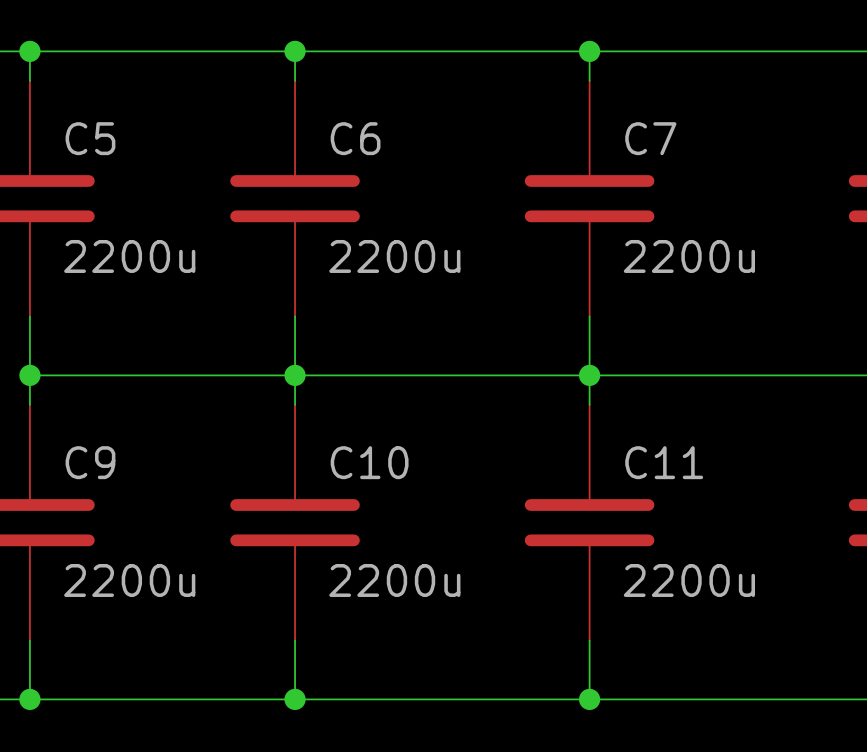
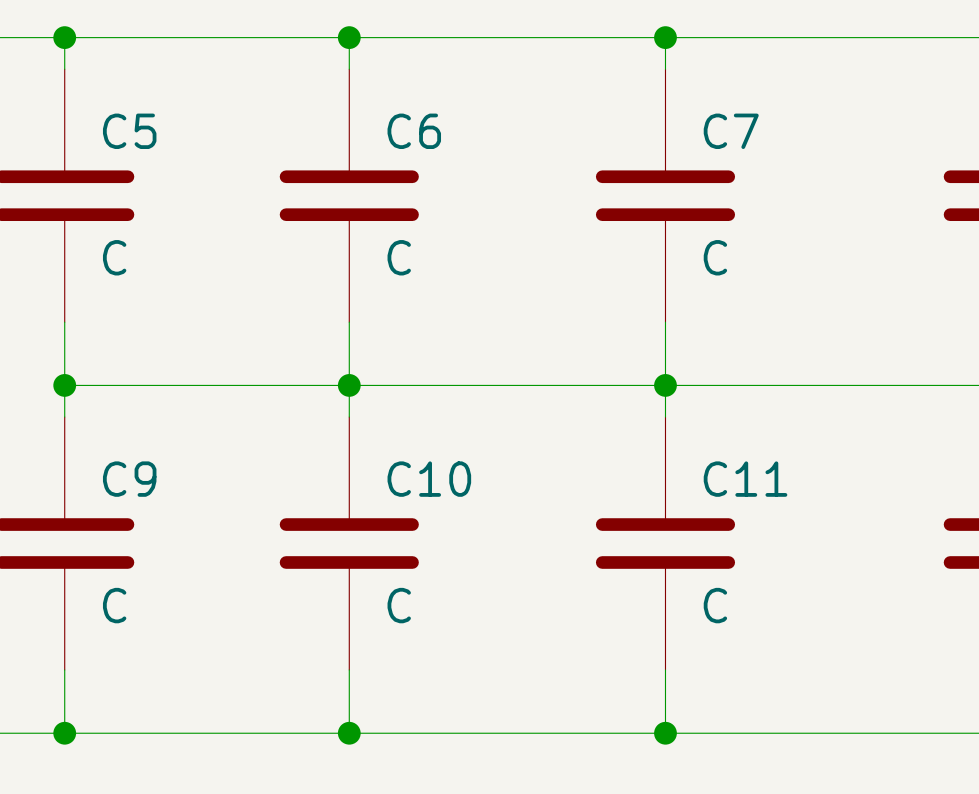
C5 value: 2200u (129, 256) -> C (114, 257)
C6 value: 2200u (394, 256) -> C (399, 257)
C7 value: 2200u (689, 256) -> C (715, 257)
C9 value: 2200u (129, 580) -> C (114, 605)
C10 value: 2200u (394, 580) -> C (399, 605)
C11 value: 2200u (689, 580) -> C (715, 605)

